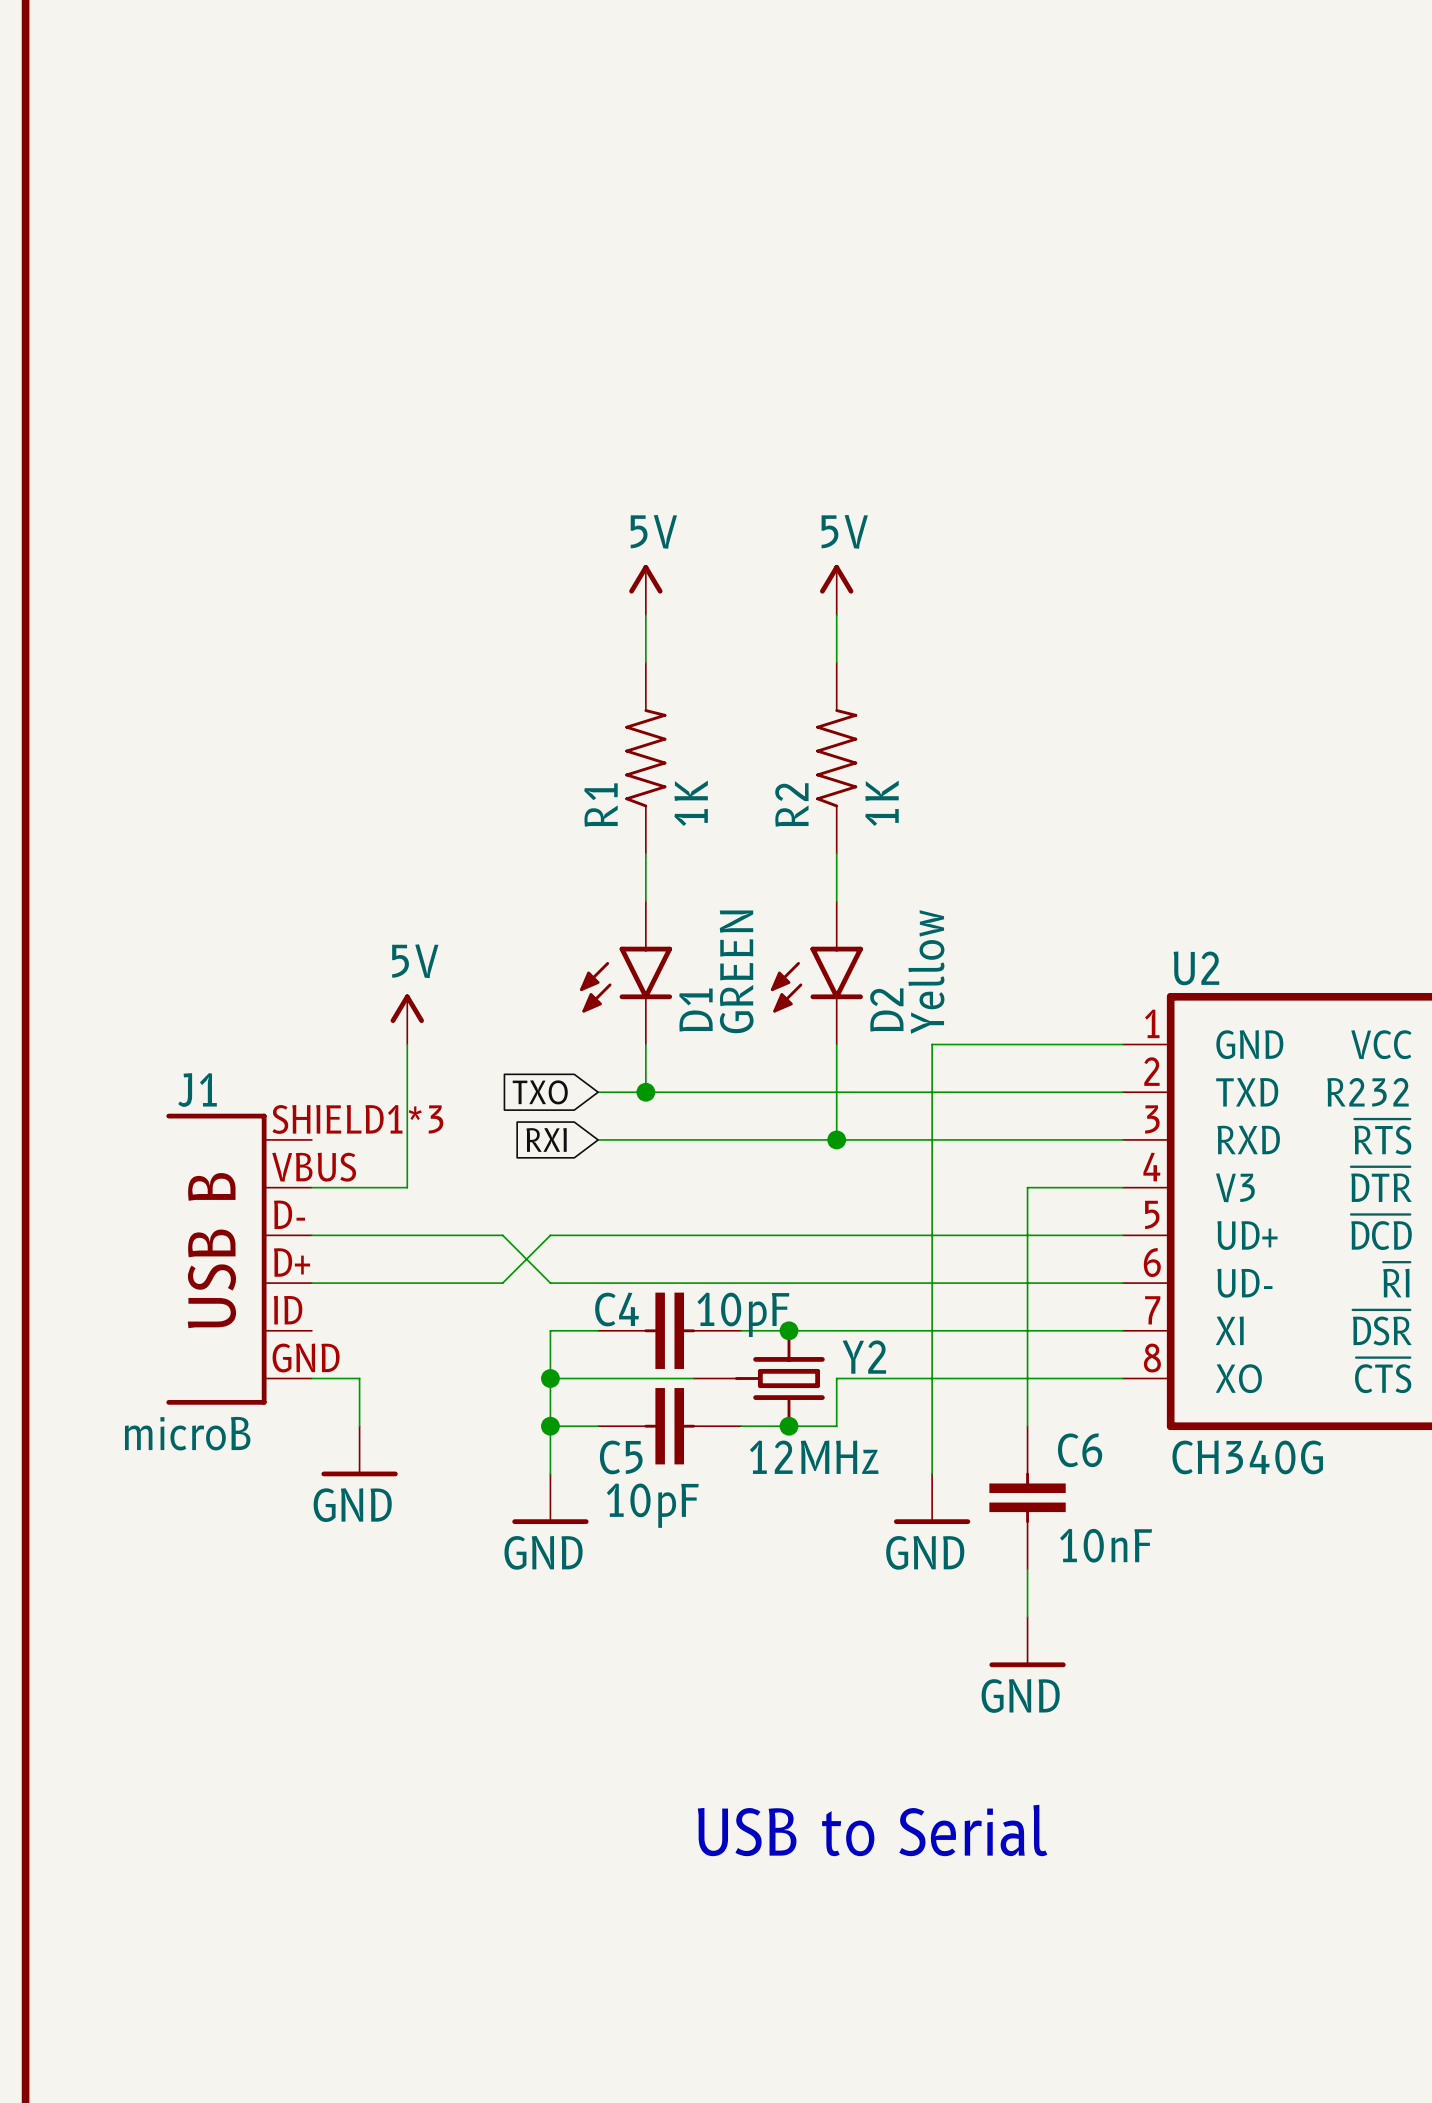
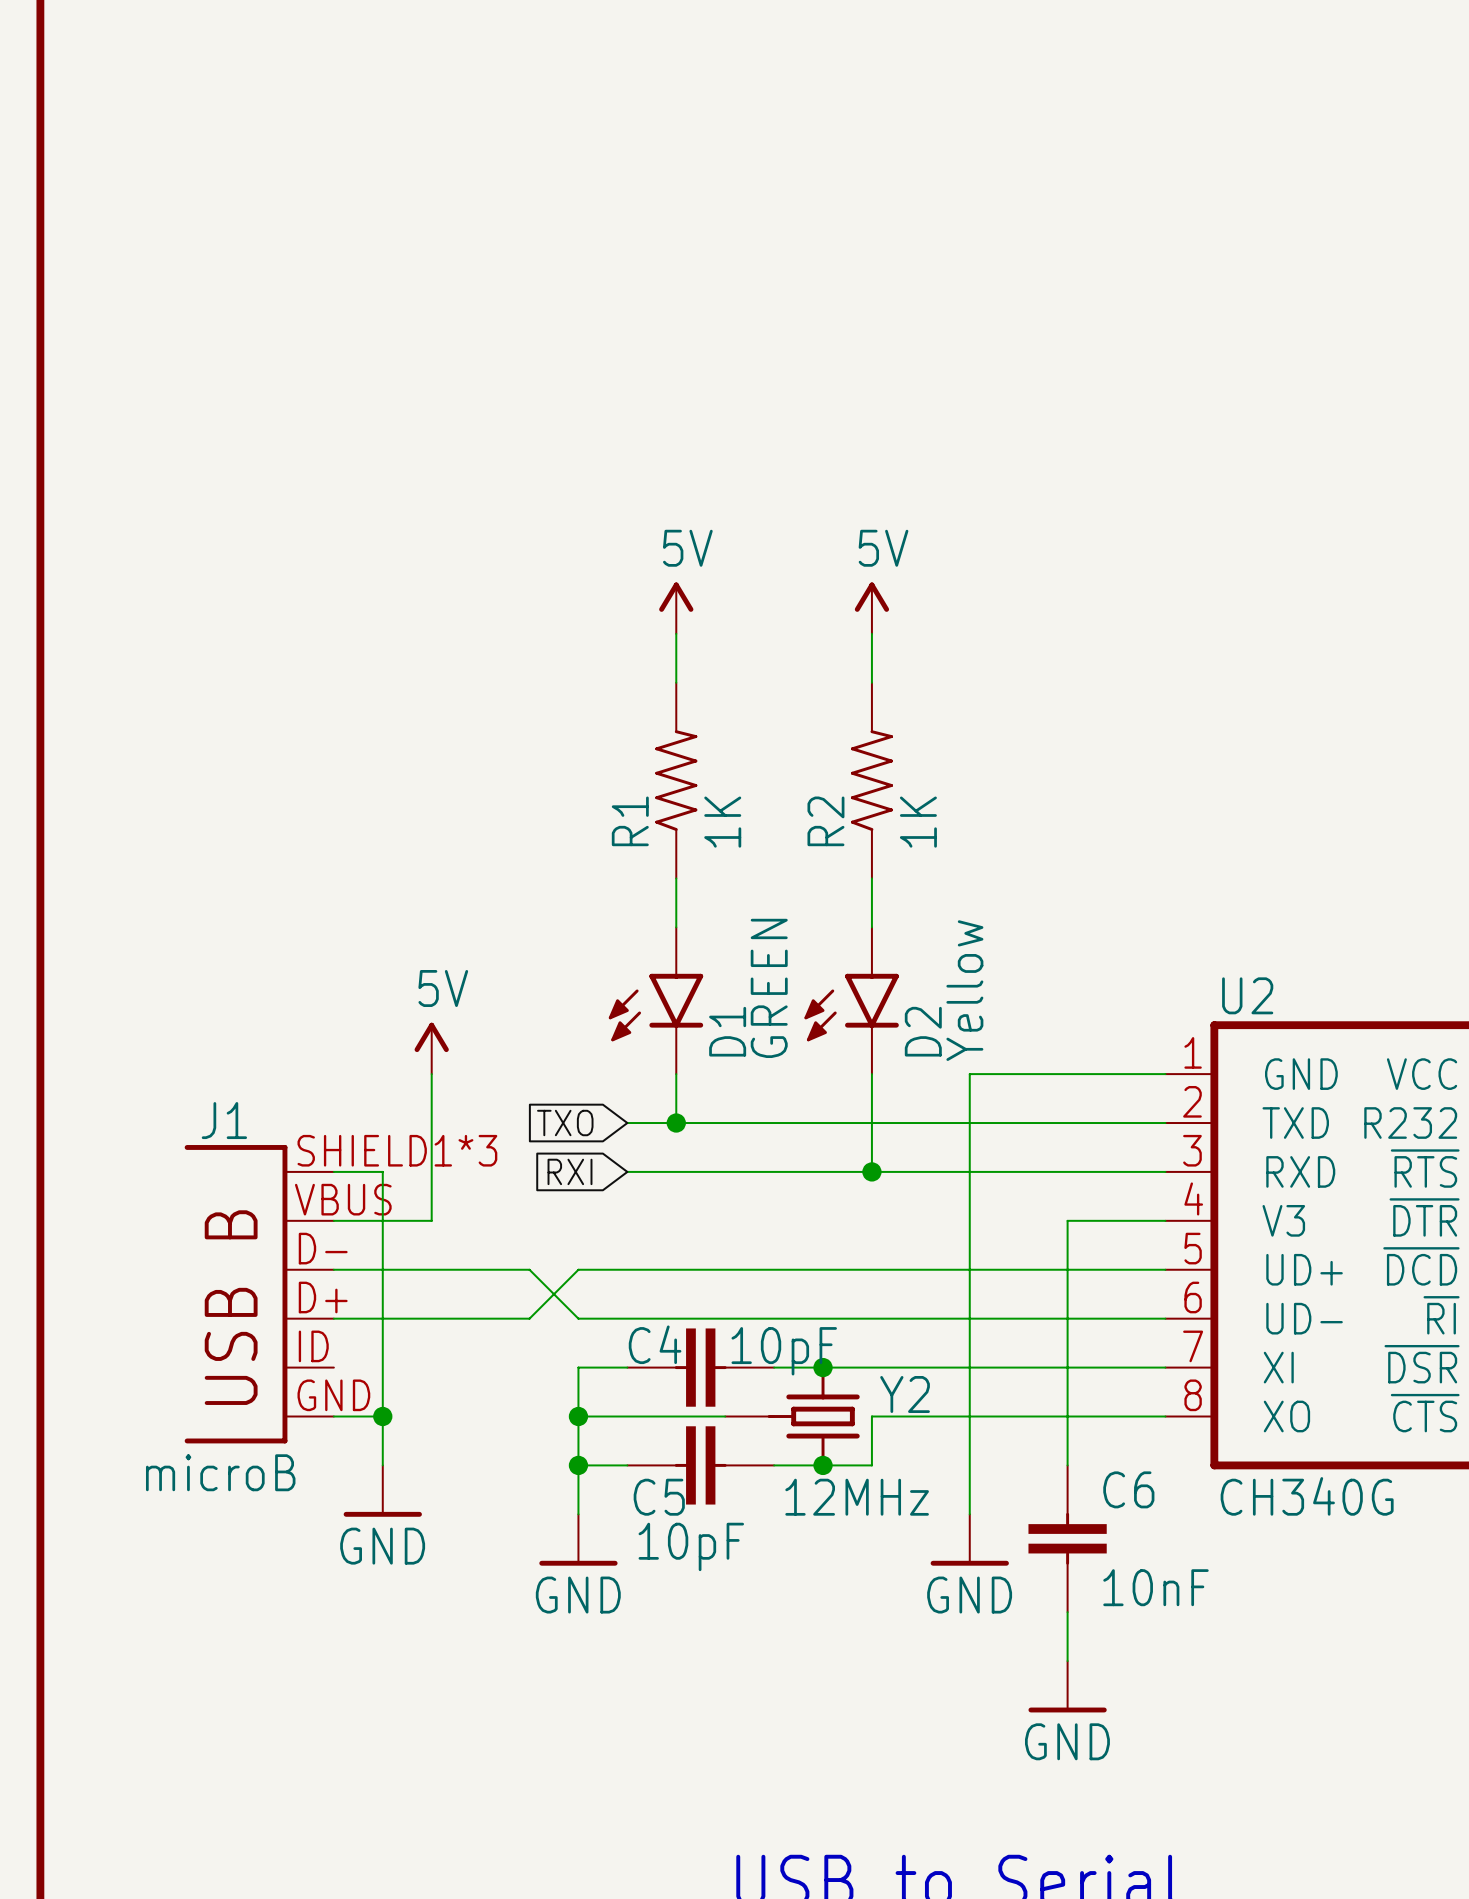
wire: none -> (333, 1171) (382, 1171) (382, 1416)
junction: none -> (382, 1416)

